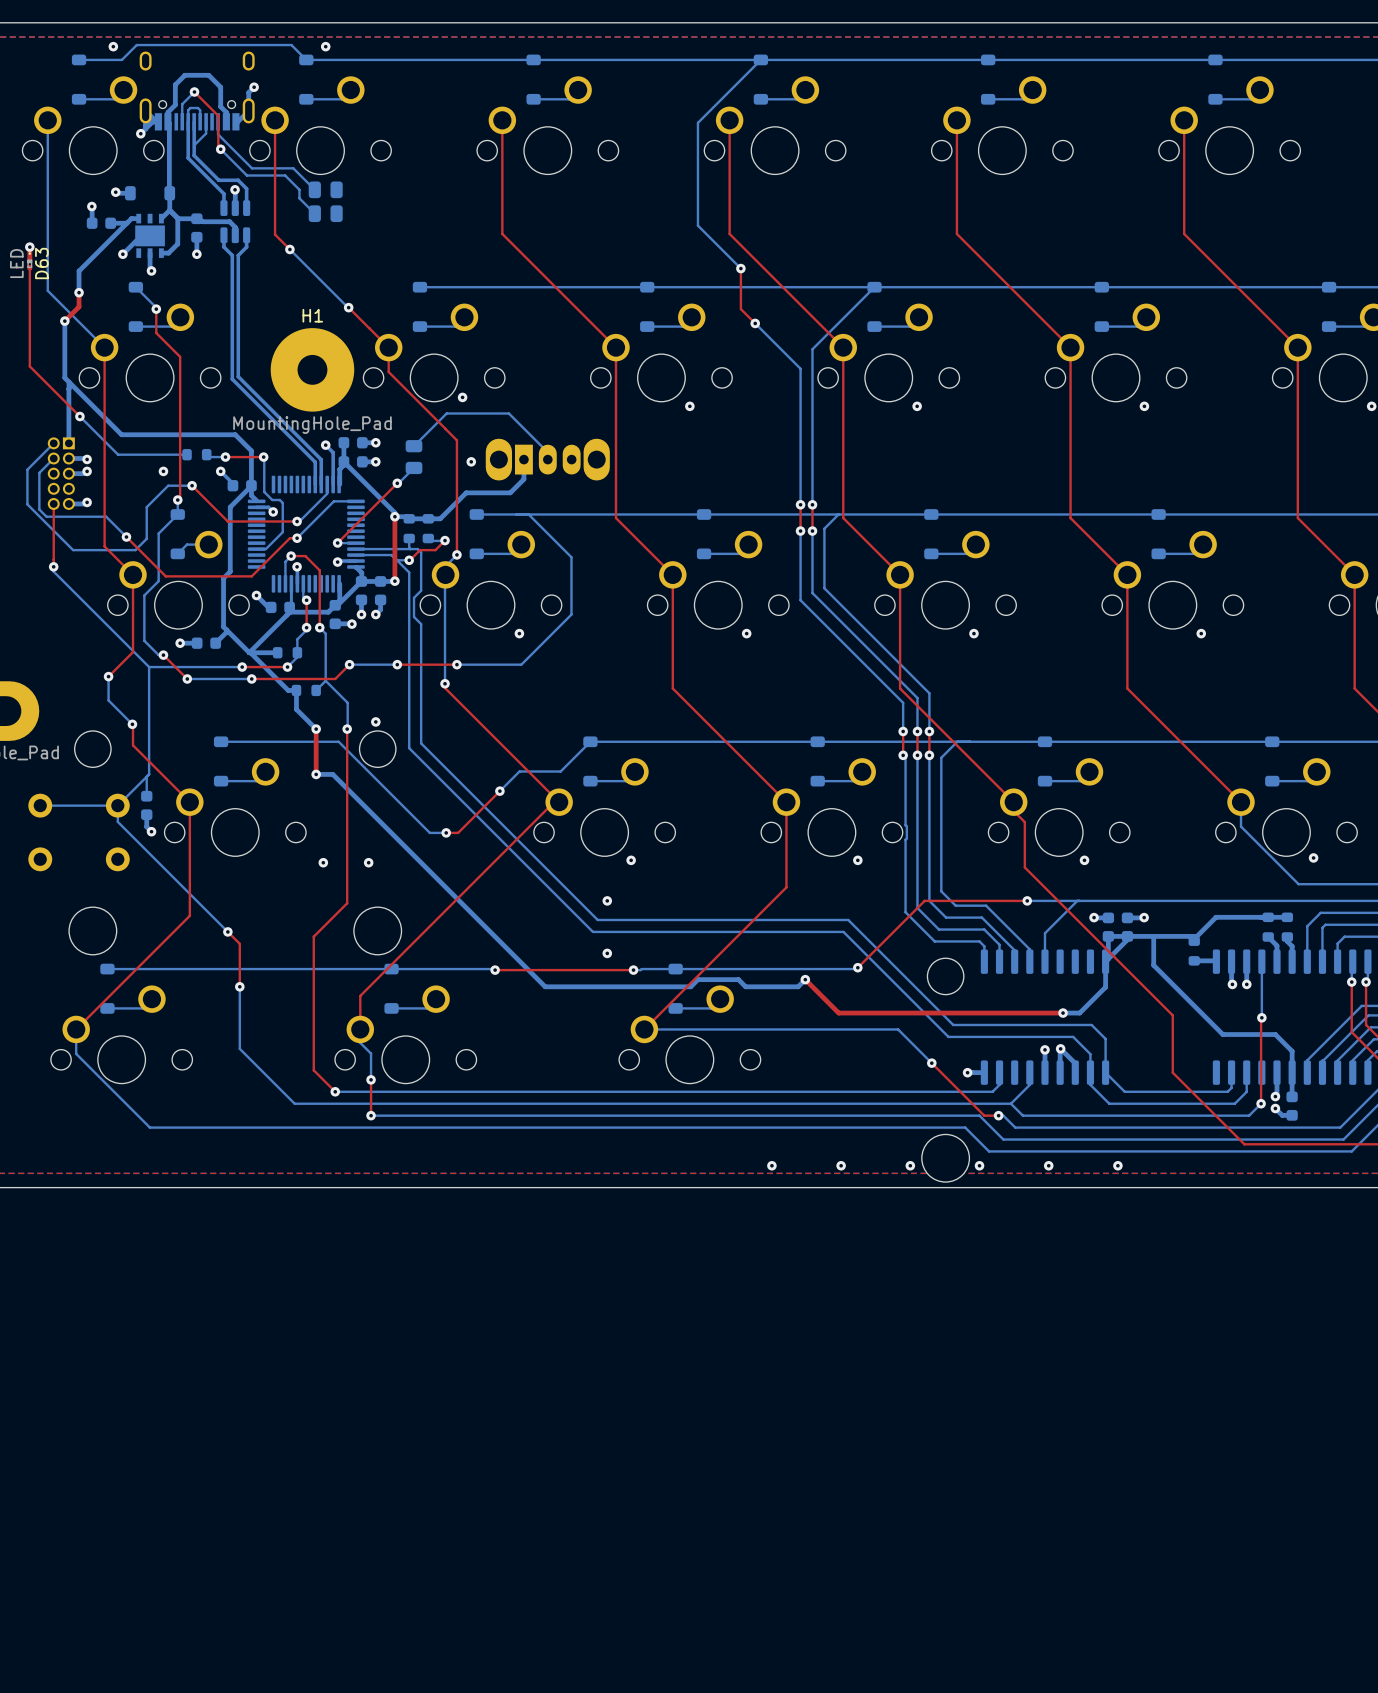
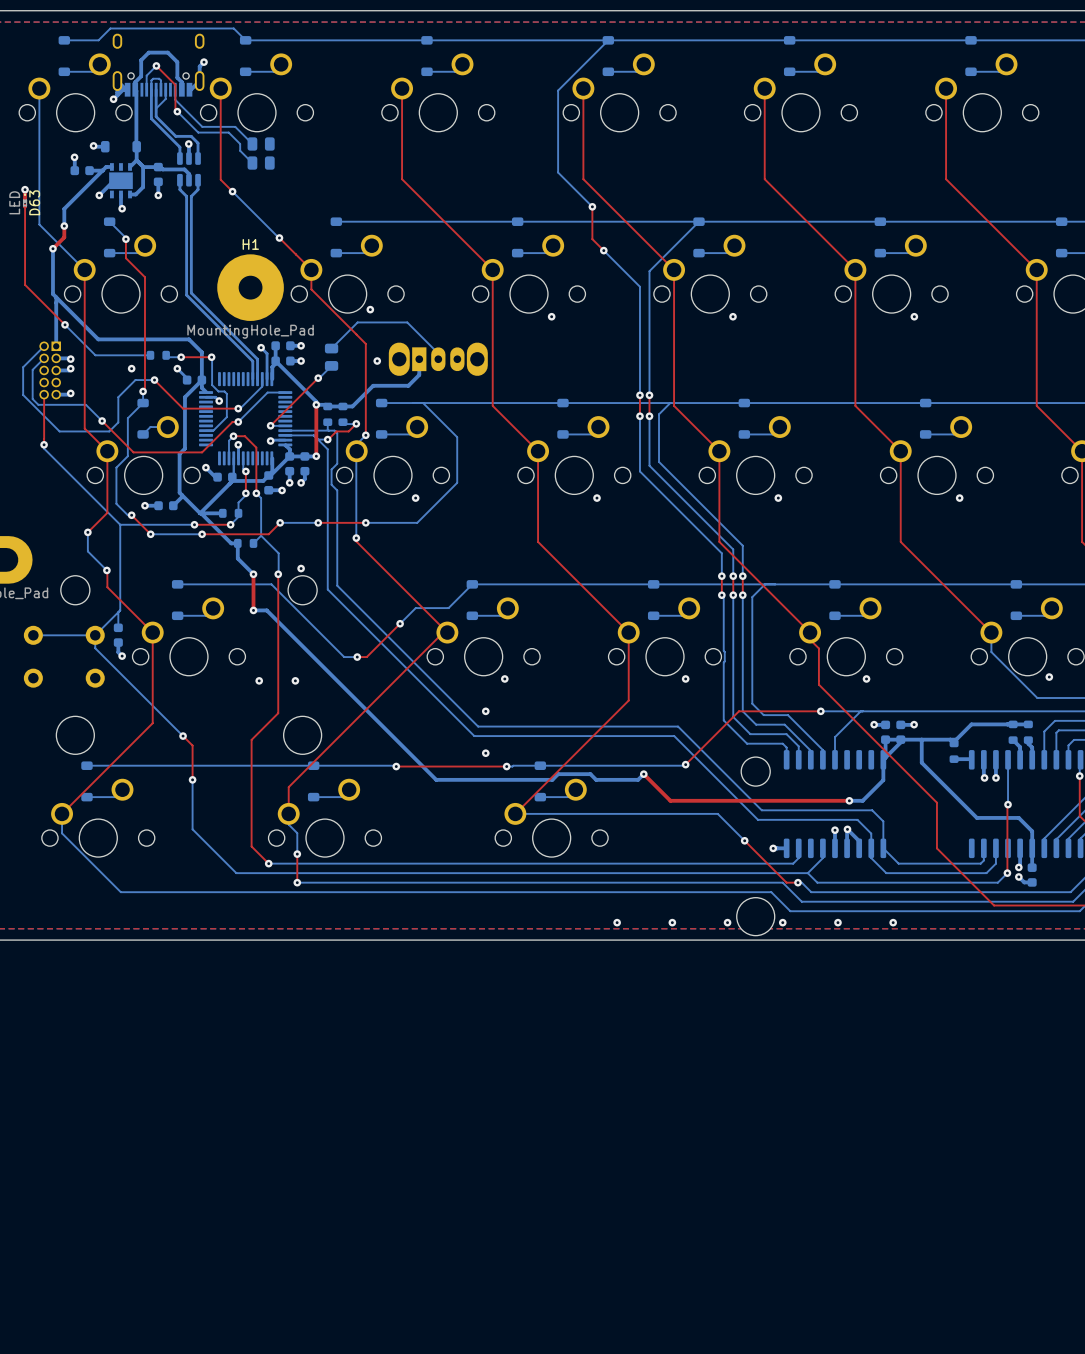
via: (113, 46) -> none
via: (325, 46) -> none

